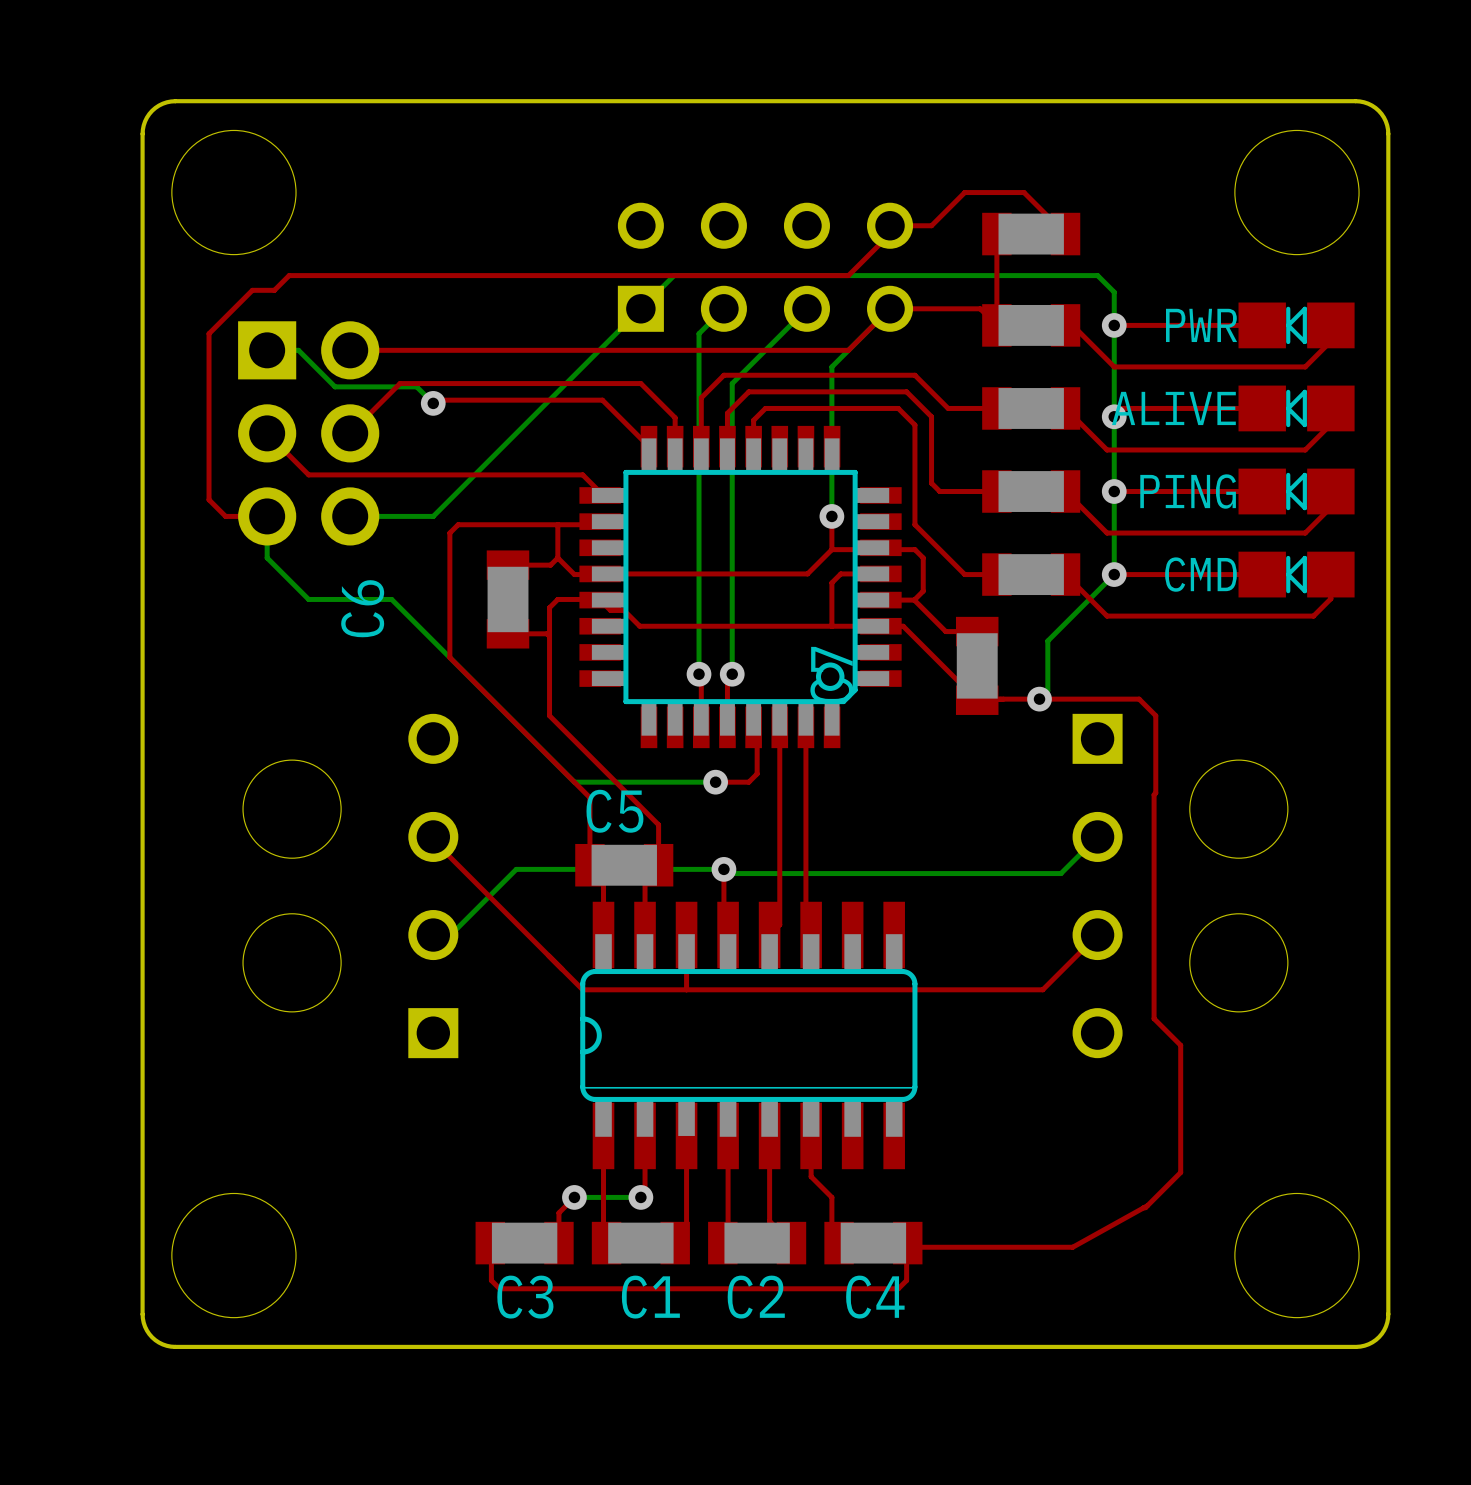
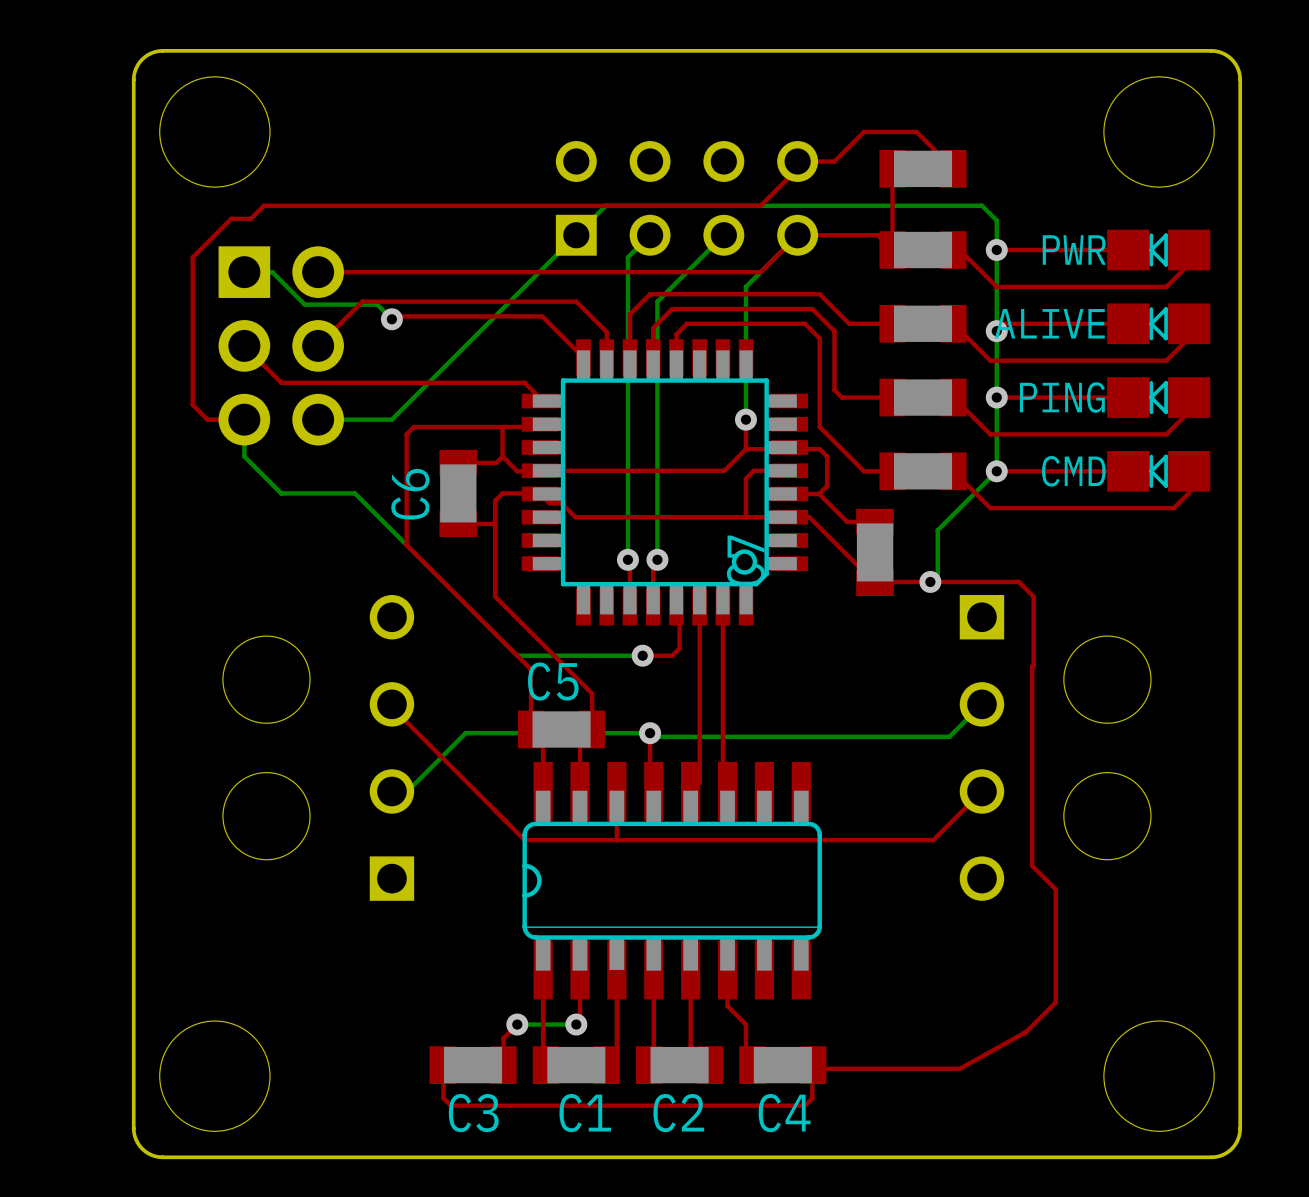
C6 name position: C6 (362, 608) -> C6 (410, 494)

